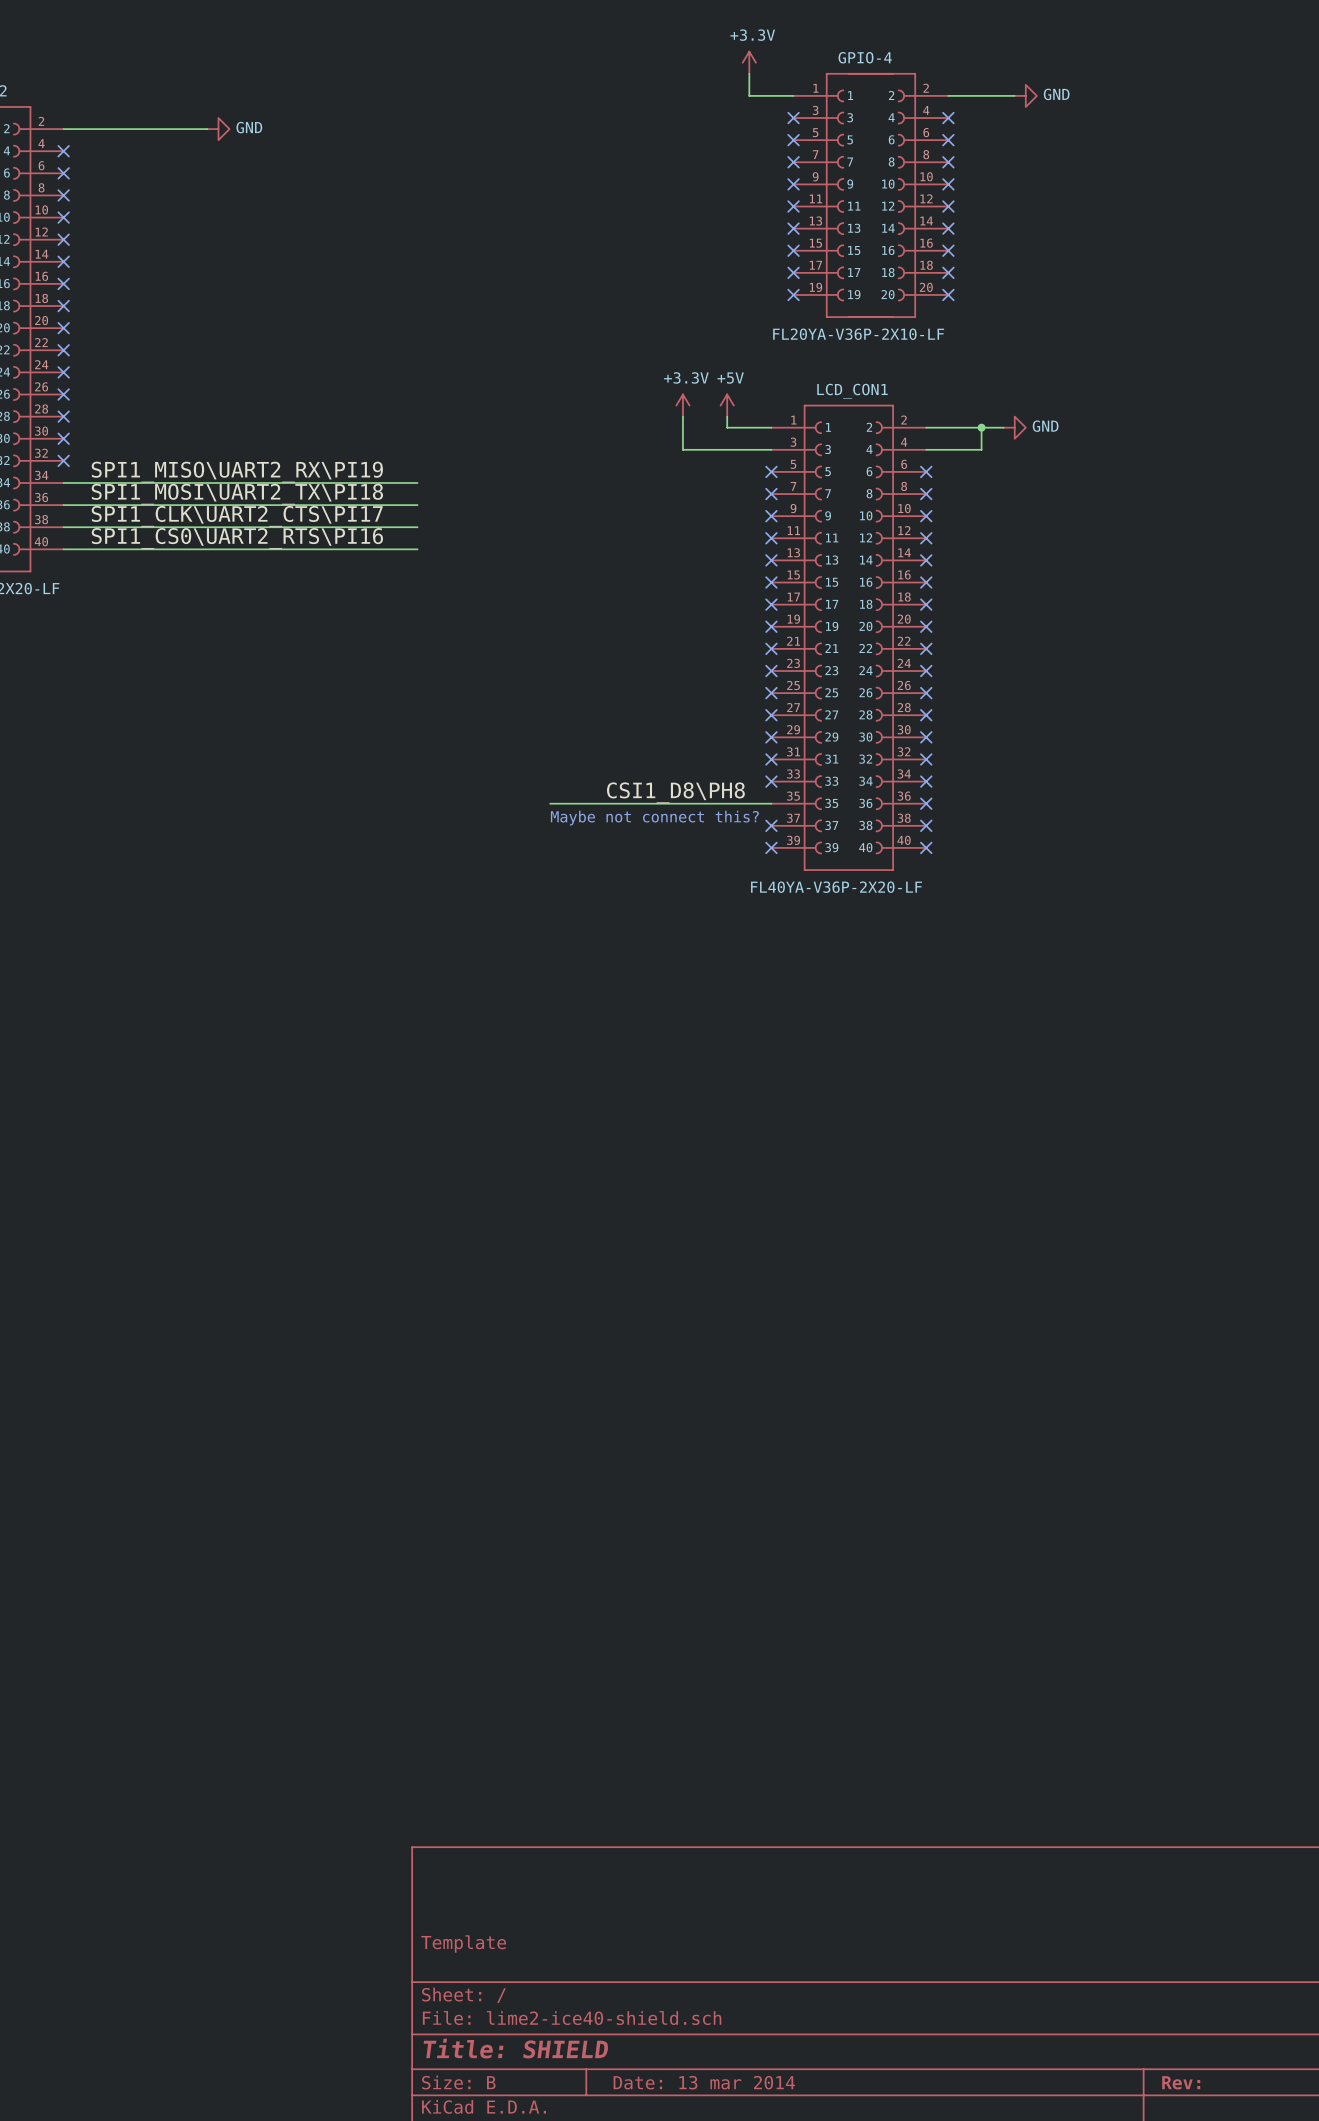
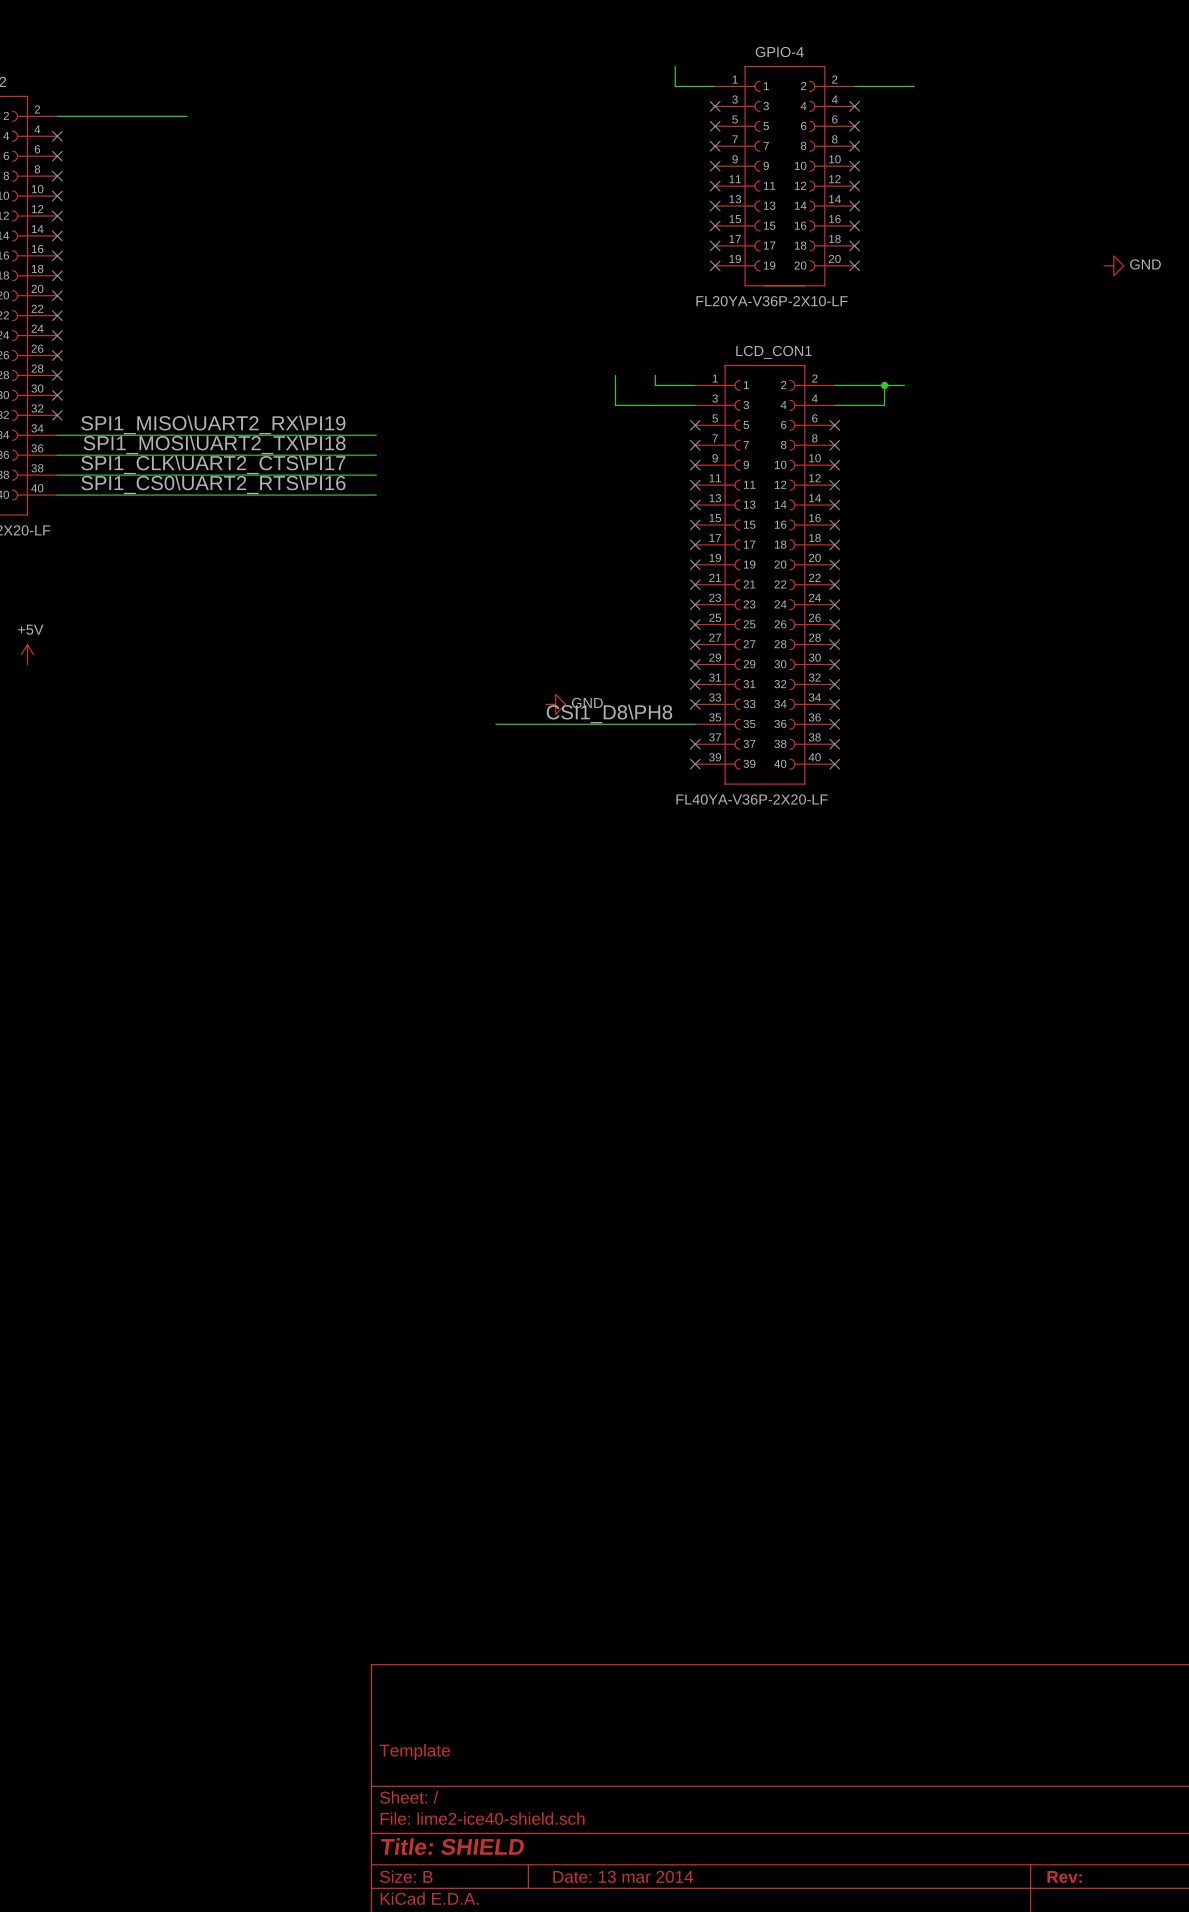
power symbol: +3.3V (749, 62) -> none
power symbol: GND (1025, 95) -> none
power symbol: GND (218, 129) -> none
power symbol: none -> GND (1113, 265)
power symbol: +3.3V (682, 405) -> none
power symbol: +5V (727, 405) -> none
power symbol: GND (1014, 427) -> none
power symbol: none -> +5V (27, 654)
power symbol: none -> GND (555, 704)
text: Maybe not connect this? (654, 818) -> none

